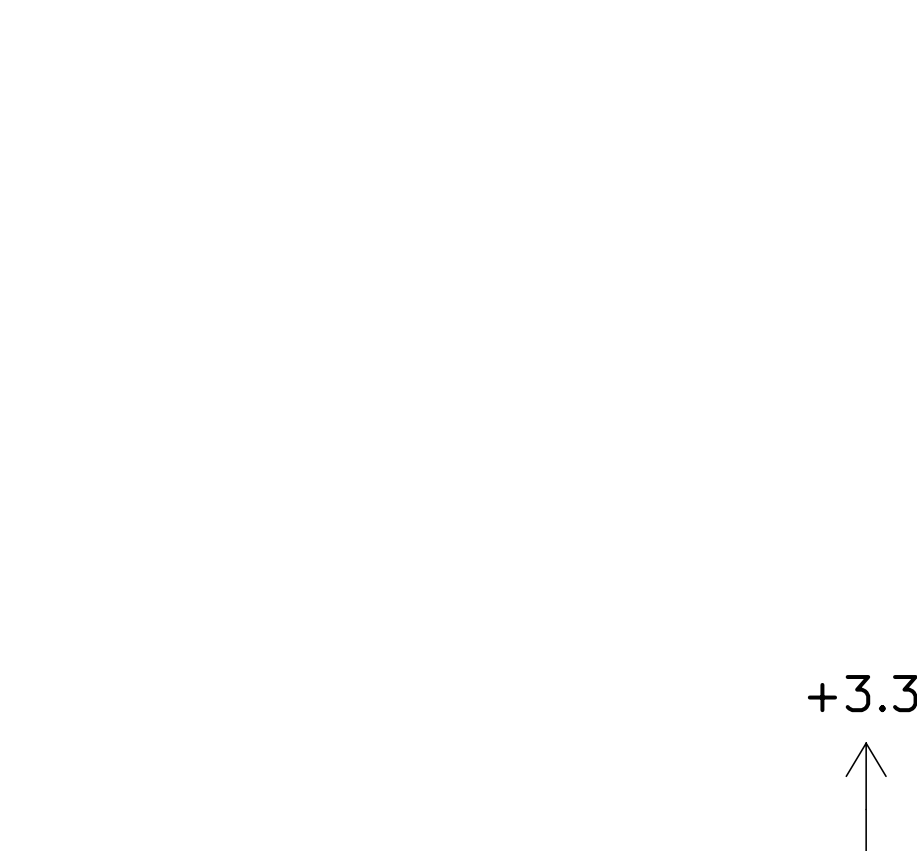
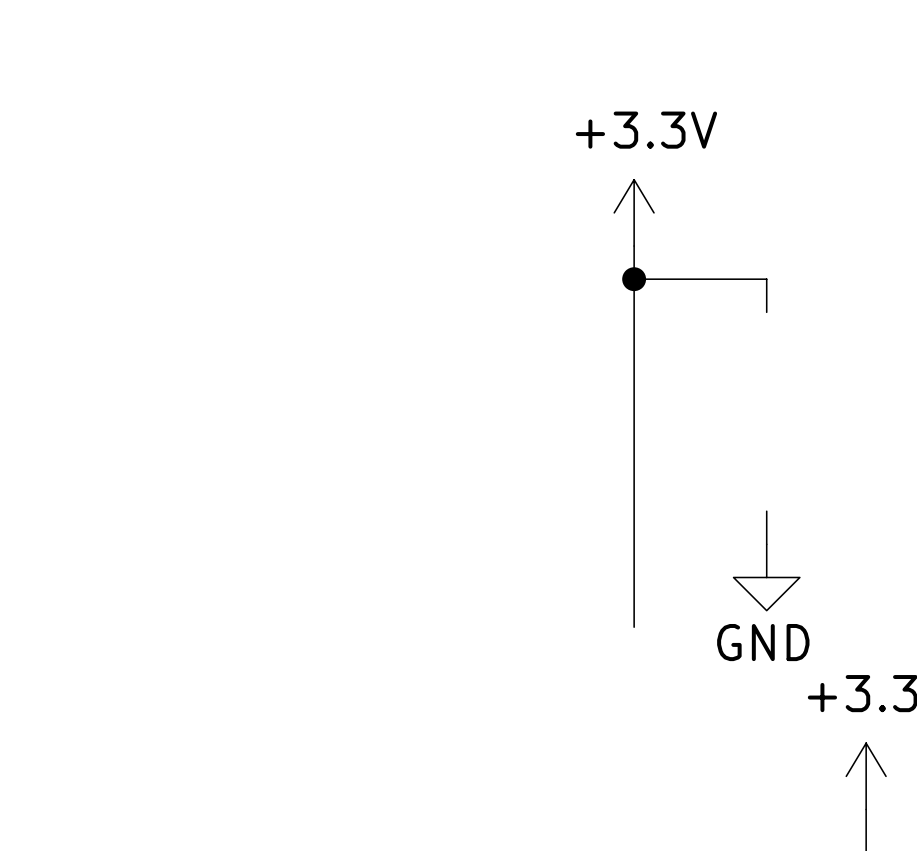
power symbol: none -> +3.3V (634, 212)
wire: none -> (634, 246) (634, 627)
wire: none -> (634, 279) (766, 279) (766, 312)
junction: none -> (634, 279)
wire: none -> (766, 511) (766, 544)
power symbol: none -> GND (766, 577)

